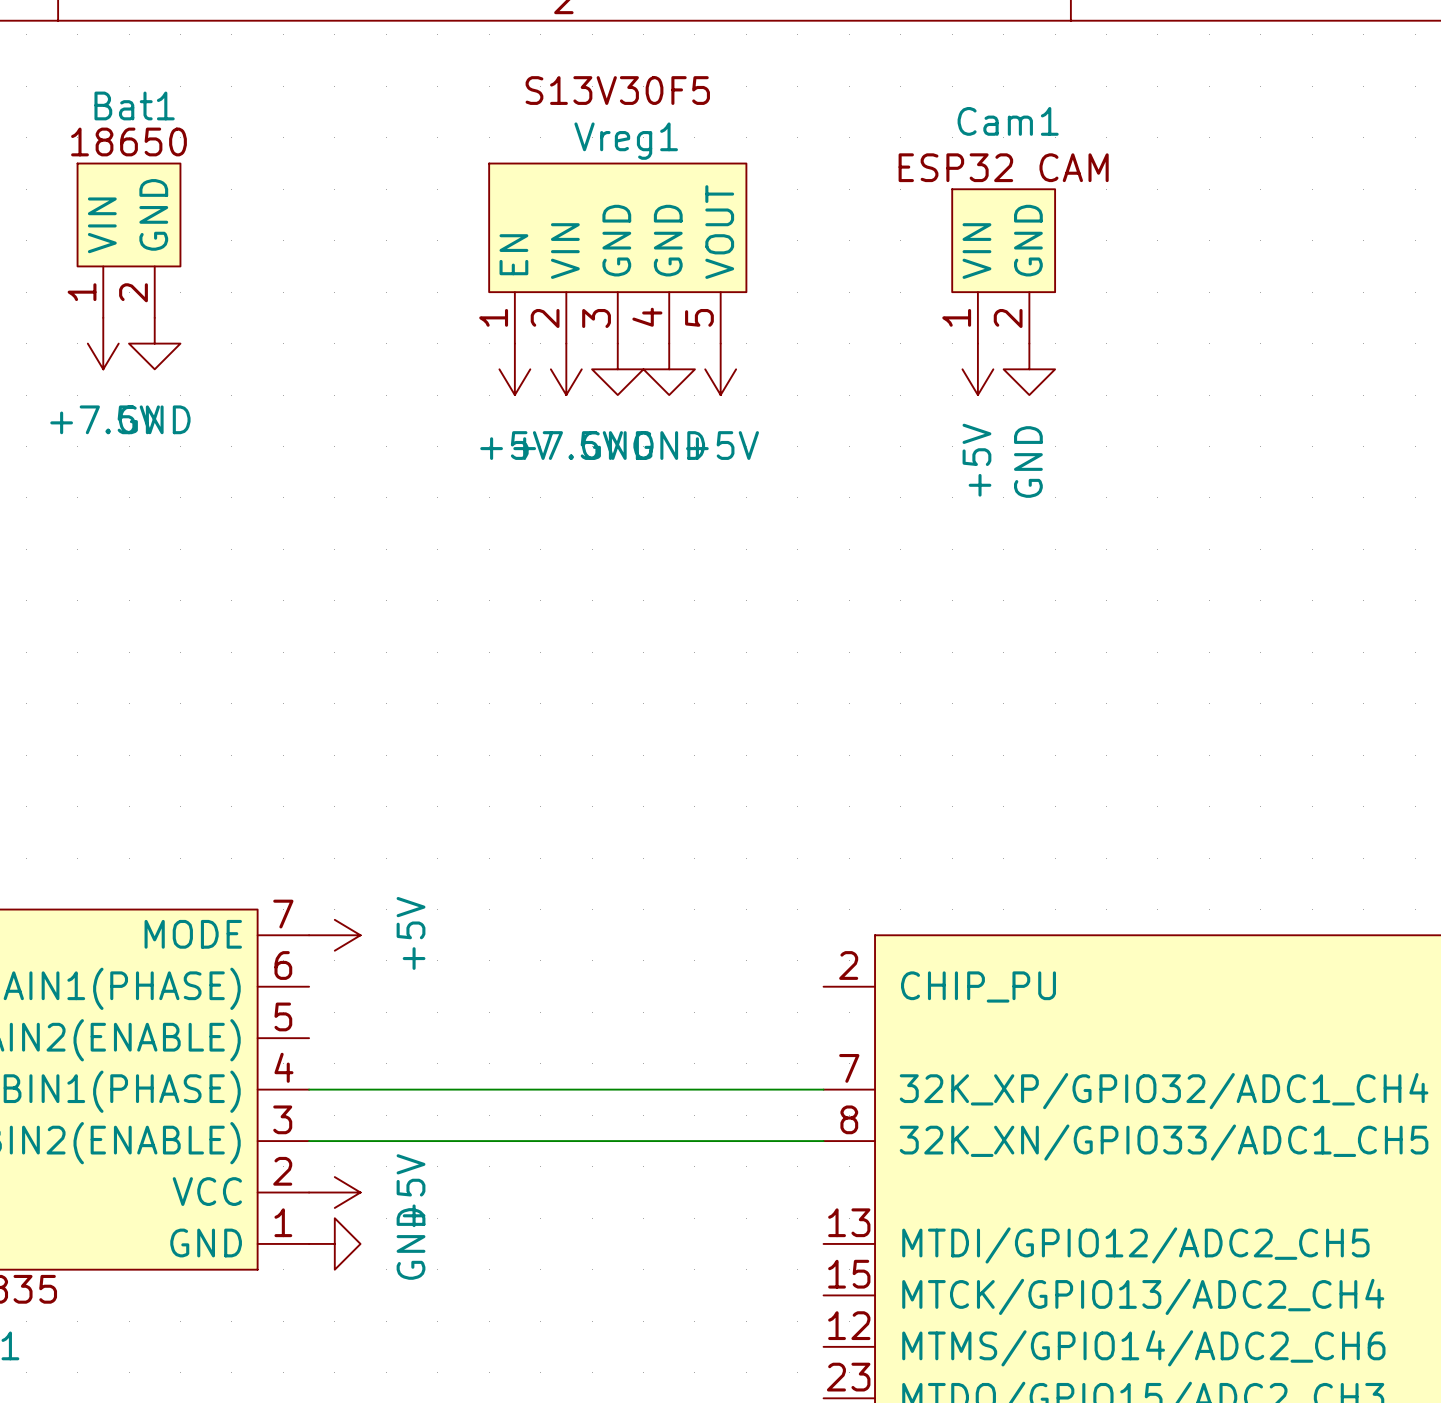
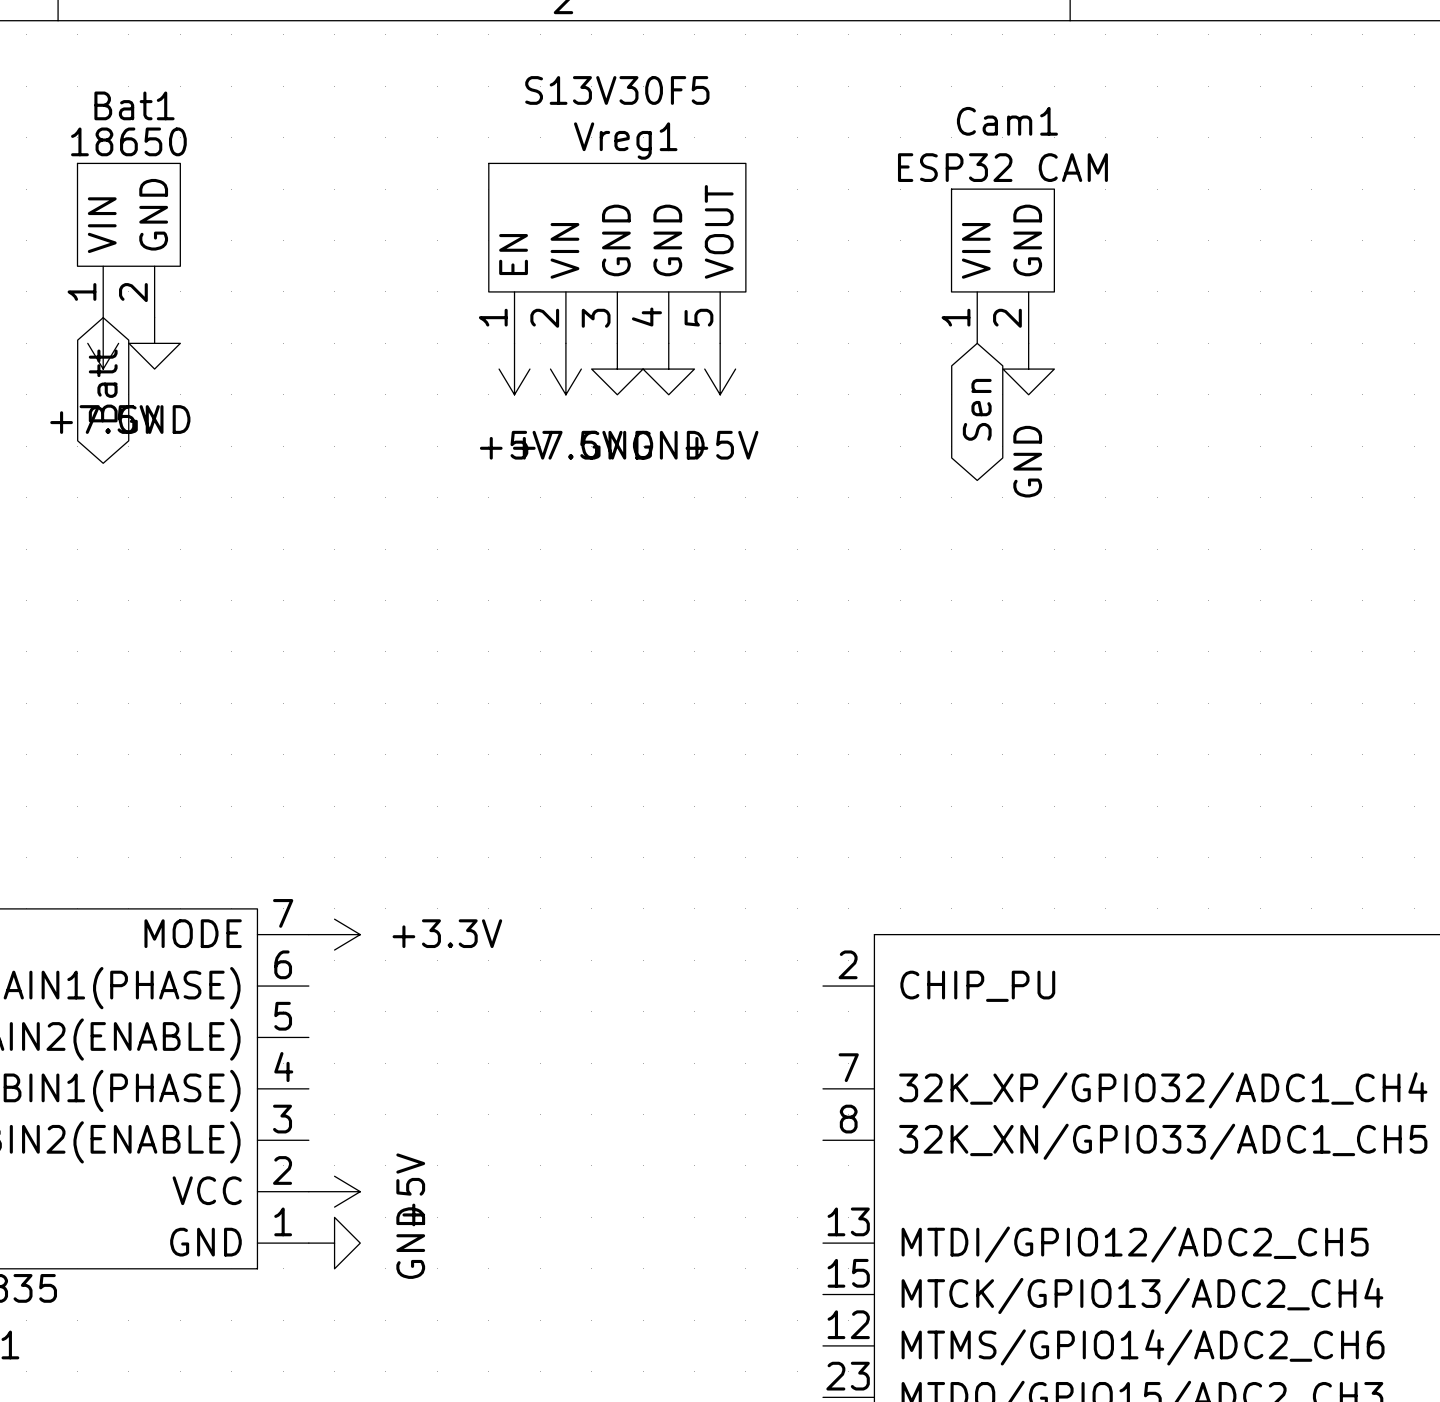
power symbol: +5V (977, 369) -> none
global label: none -> Batt (103, 385)
global label: none -> Sen (977, 409)
power symbol: +5V (334, 935) -> +3.3V (334, 934)
wire: (309, 1089) (823, 1089) -> none
wire: (309, 1141) (823, 1141) -> none

